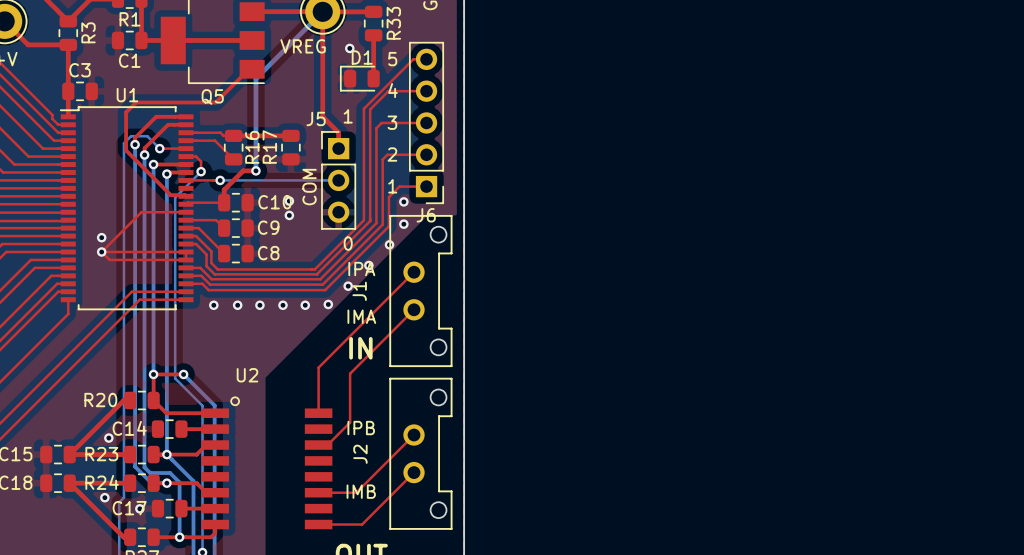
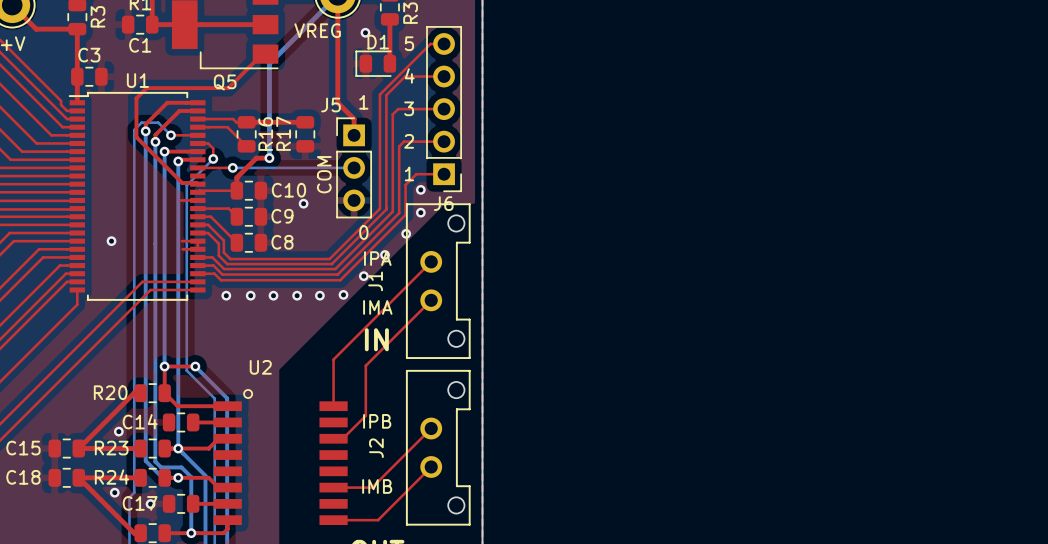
via: (289, 201) -> none
top track: (169, 212) (141, 212) (101, 251) -> none
via: (101, 237) -> none
top track: (101, 251) (170, 251) -> none
top track: (101, 251) (109, 259) (171, 259) -> none

